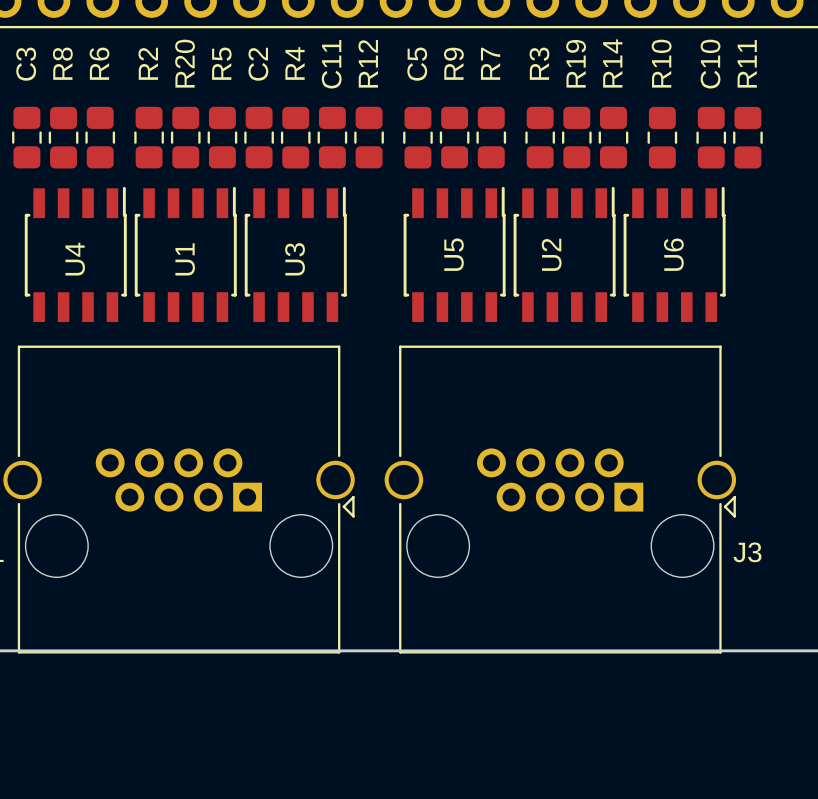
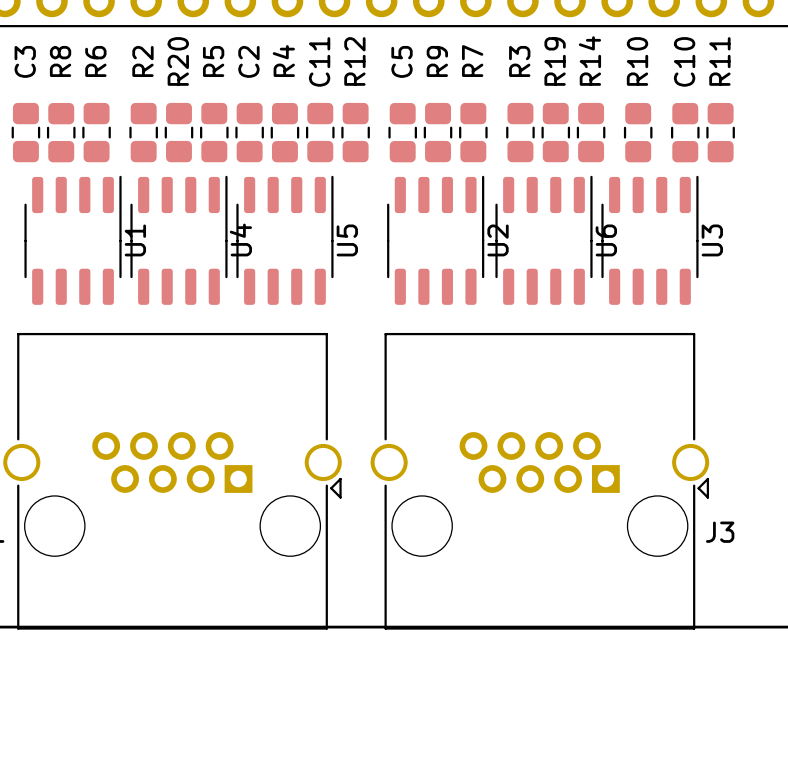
U4 footprint: [24, 186, 127, 323] -> [130, 175, 228, 305]
U1 footprint: [134, 186, 237, 323] -> [24, 175, 122, 305]
U3 footprint: [244, 186, 347, 323] -> [601, 175, 699, 305]
U5 footprint: [403, 186, 506, 323] -> [236, 175, 334, 305]
U2 footprint: [513, 186, 616, 323] -> [387, 175, 485, 305]
U6 footprint: [623, 186, 726, 323] -> [495, 175, 593, 305]
U5 name position: U5 (454, 254) -> U5 (347, 240)
U2 name position: U2 (551, 254) -> U2 (498, 240)
U6 name position: U6 (673, 254) -> U6 (606, 240)
U4 name position: U4 (75, 259) -> U4 (240, 240)
U1 name position: U1 (185, 259) -> U1 (135, 240)
U3 name position: U3 (295, 259) -> U3 (712, 240)

